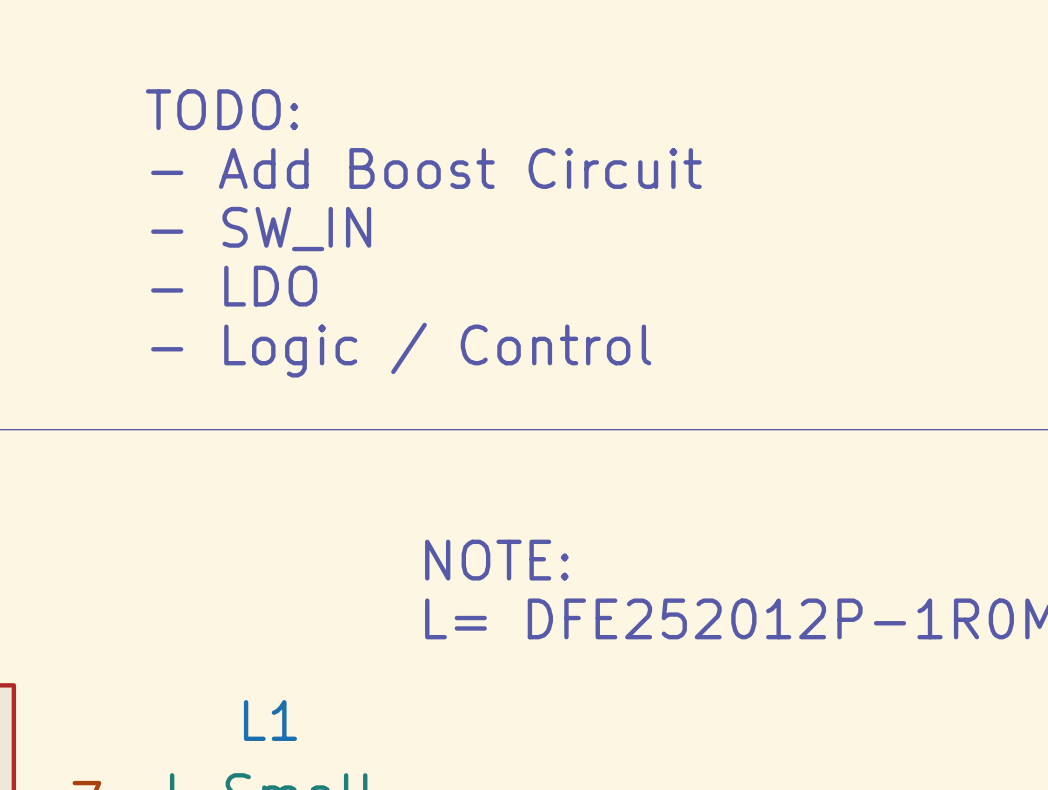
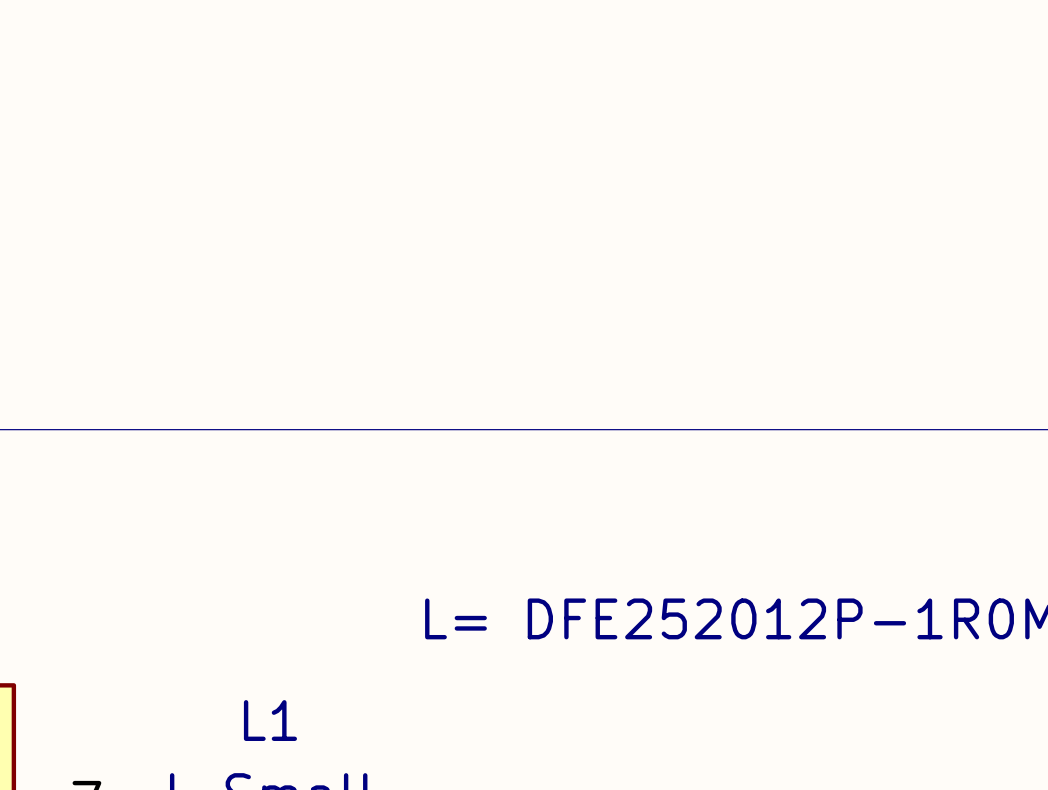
text: TODO: (222, 109) -> none
text: - Add Boost Circuit (426, 168) -> none
text: - SW_IN (261, 229) -> none
text: - LDO (234, 286) -> none
text: - Logic / Control (401, 350) -> none
text: NOTE: (496, 560) -> none

